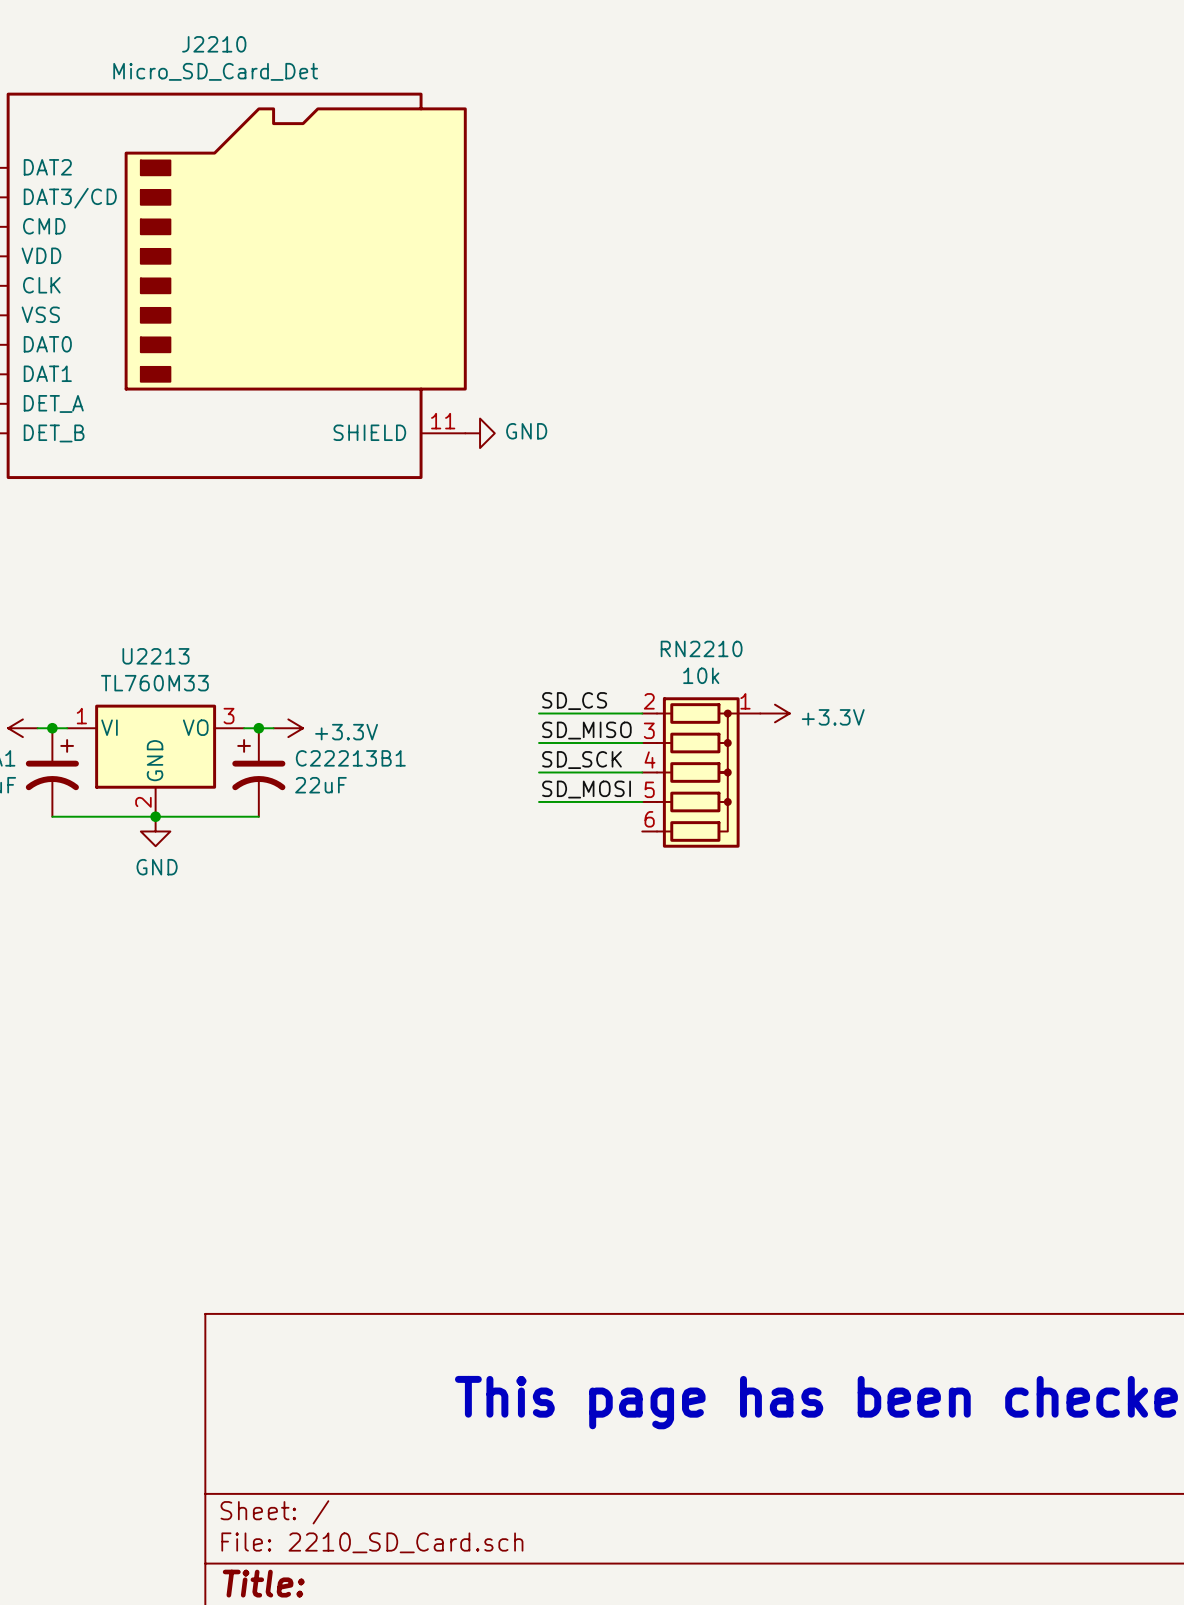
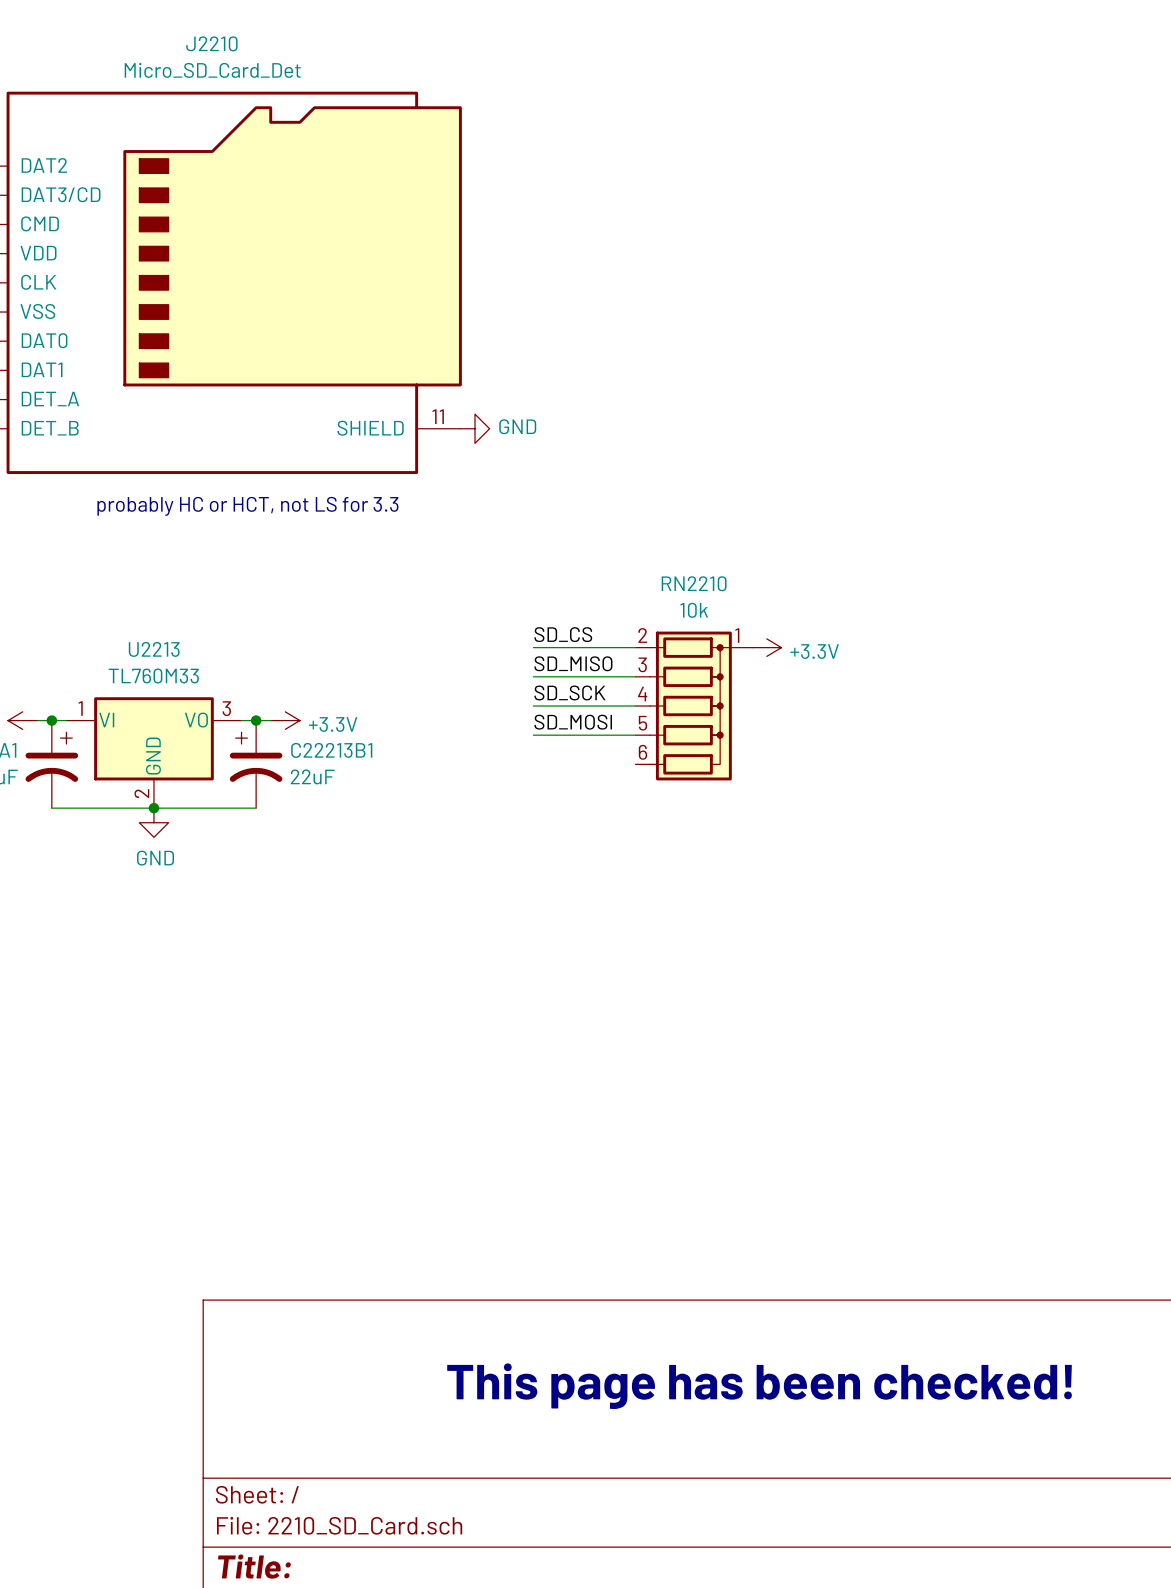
text: none -> probably HC or HCT, not LS for 3.3 (247, 506)
label: none -> SD_CS (563, 634)
label: none -> SD_MISO (573, 663)
label: SD_CS (574, 701) -> SD_SCK (569, 692)
power symbol position: +3.3V (774, 713) -> +3.3V (766, 647)
label: SD_MISO (586, 730) -> SD_MOSI (573, 722)
label: SD_SCK (581, 760) -> none
wire: (539, 772) (642, 772) -> (533, 676) (635, 676)
RN2210 position: (701, 772) -> (693, 706)
label: SD_MOSI (586, 789) -> none
wire: (539, 801) (642, 801) -> (533, 647) (635, 647)

